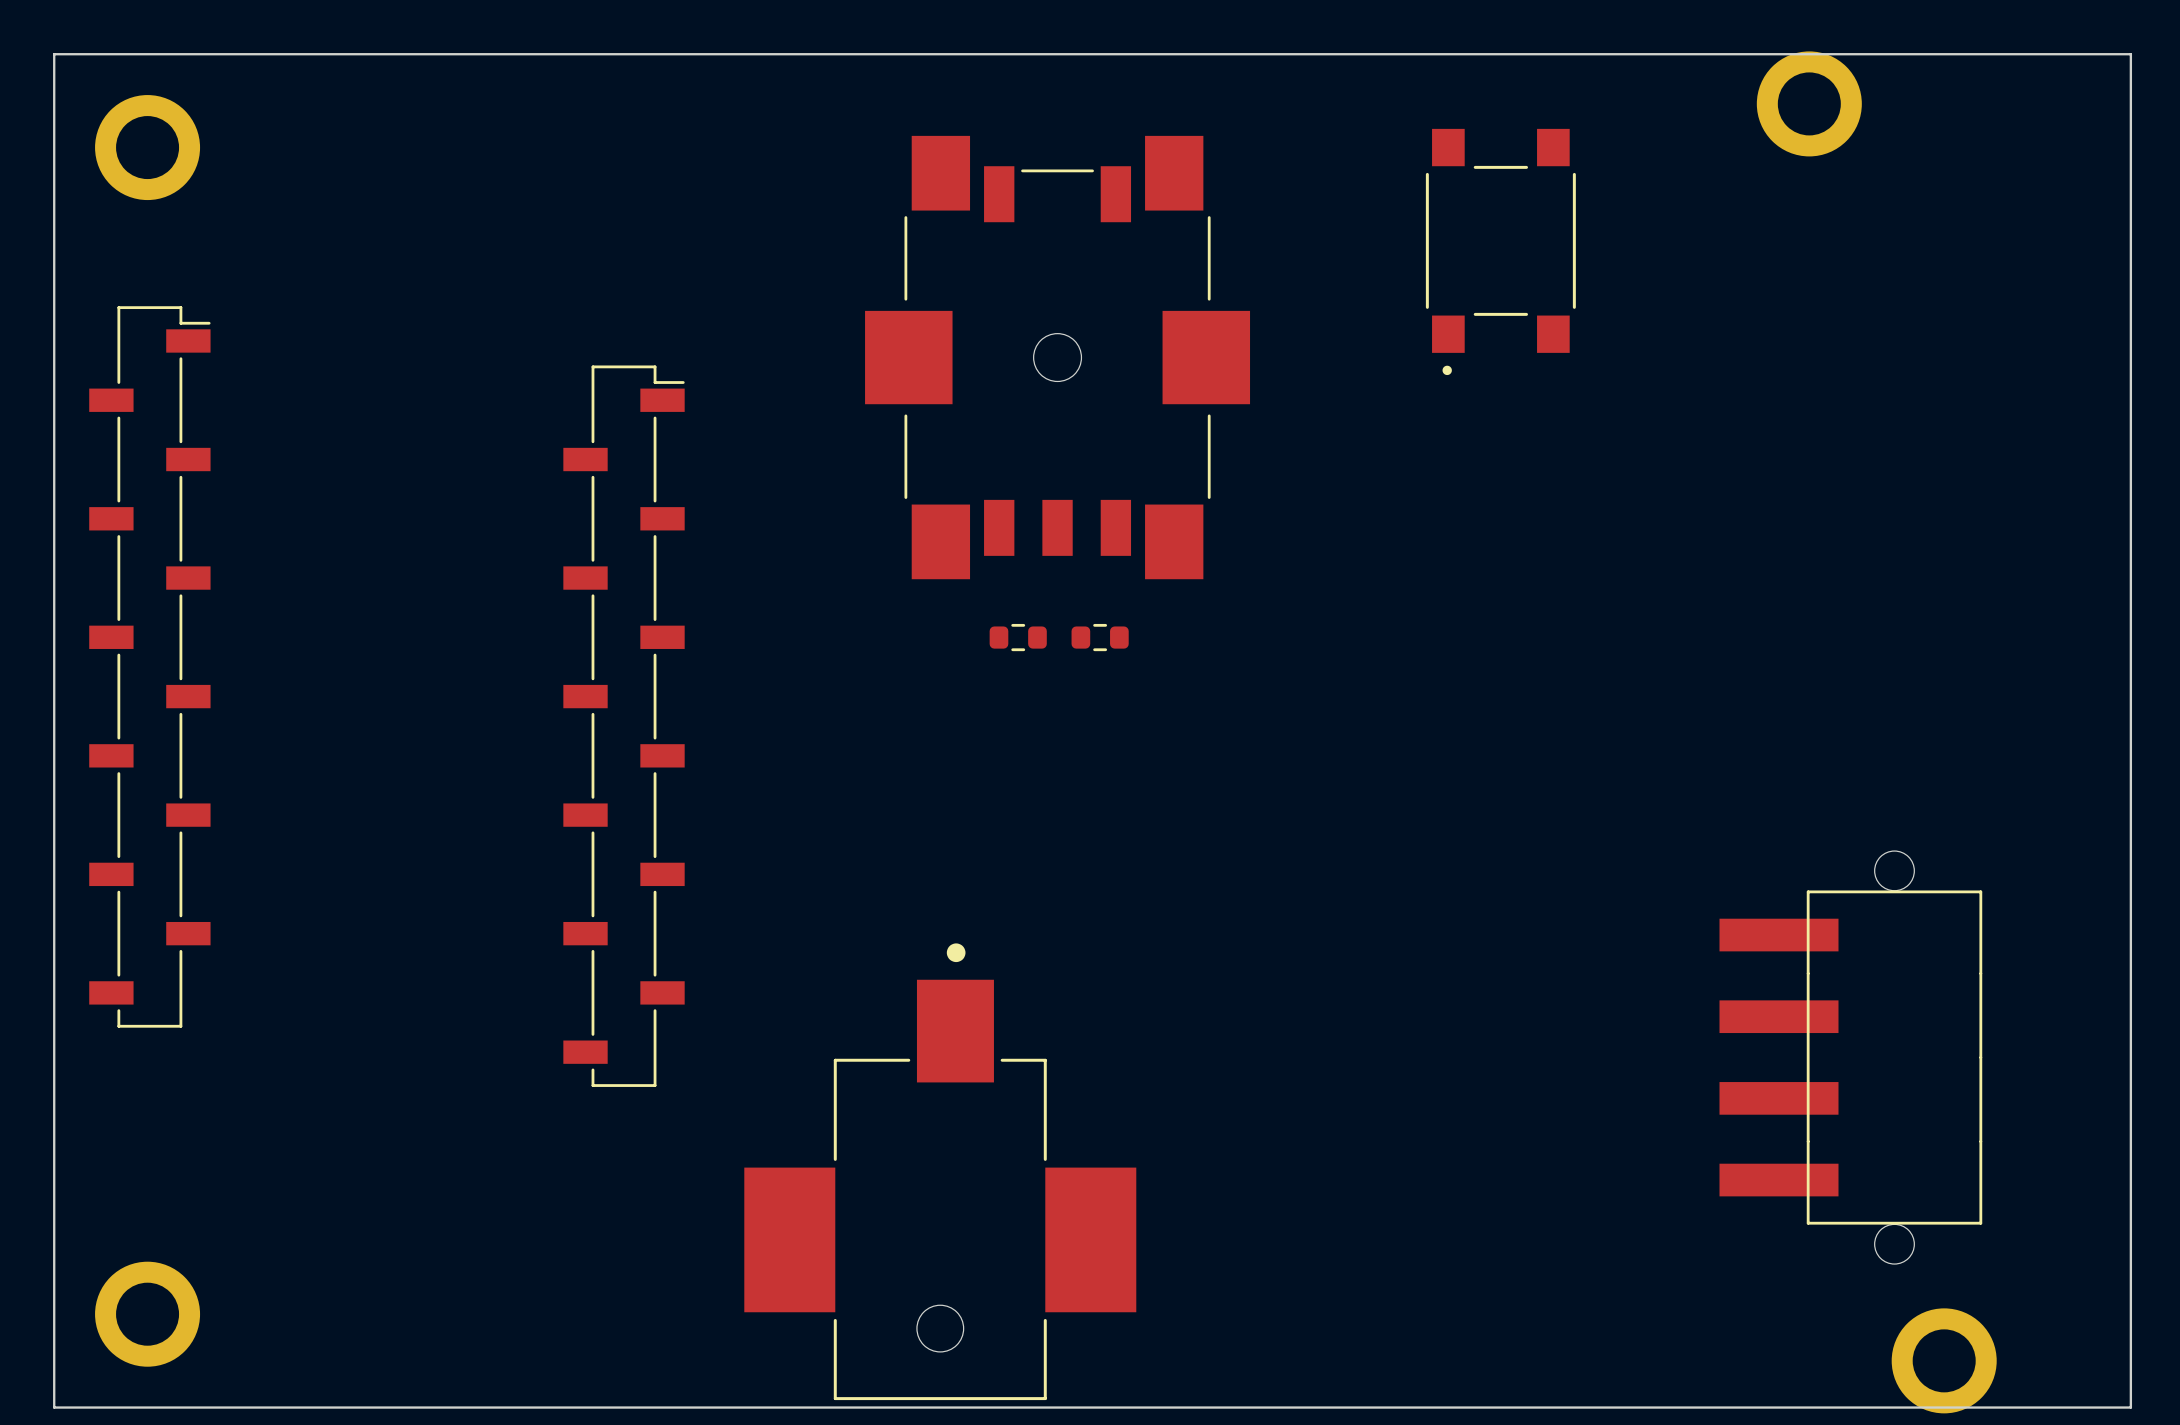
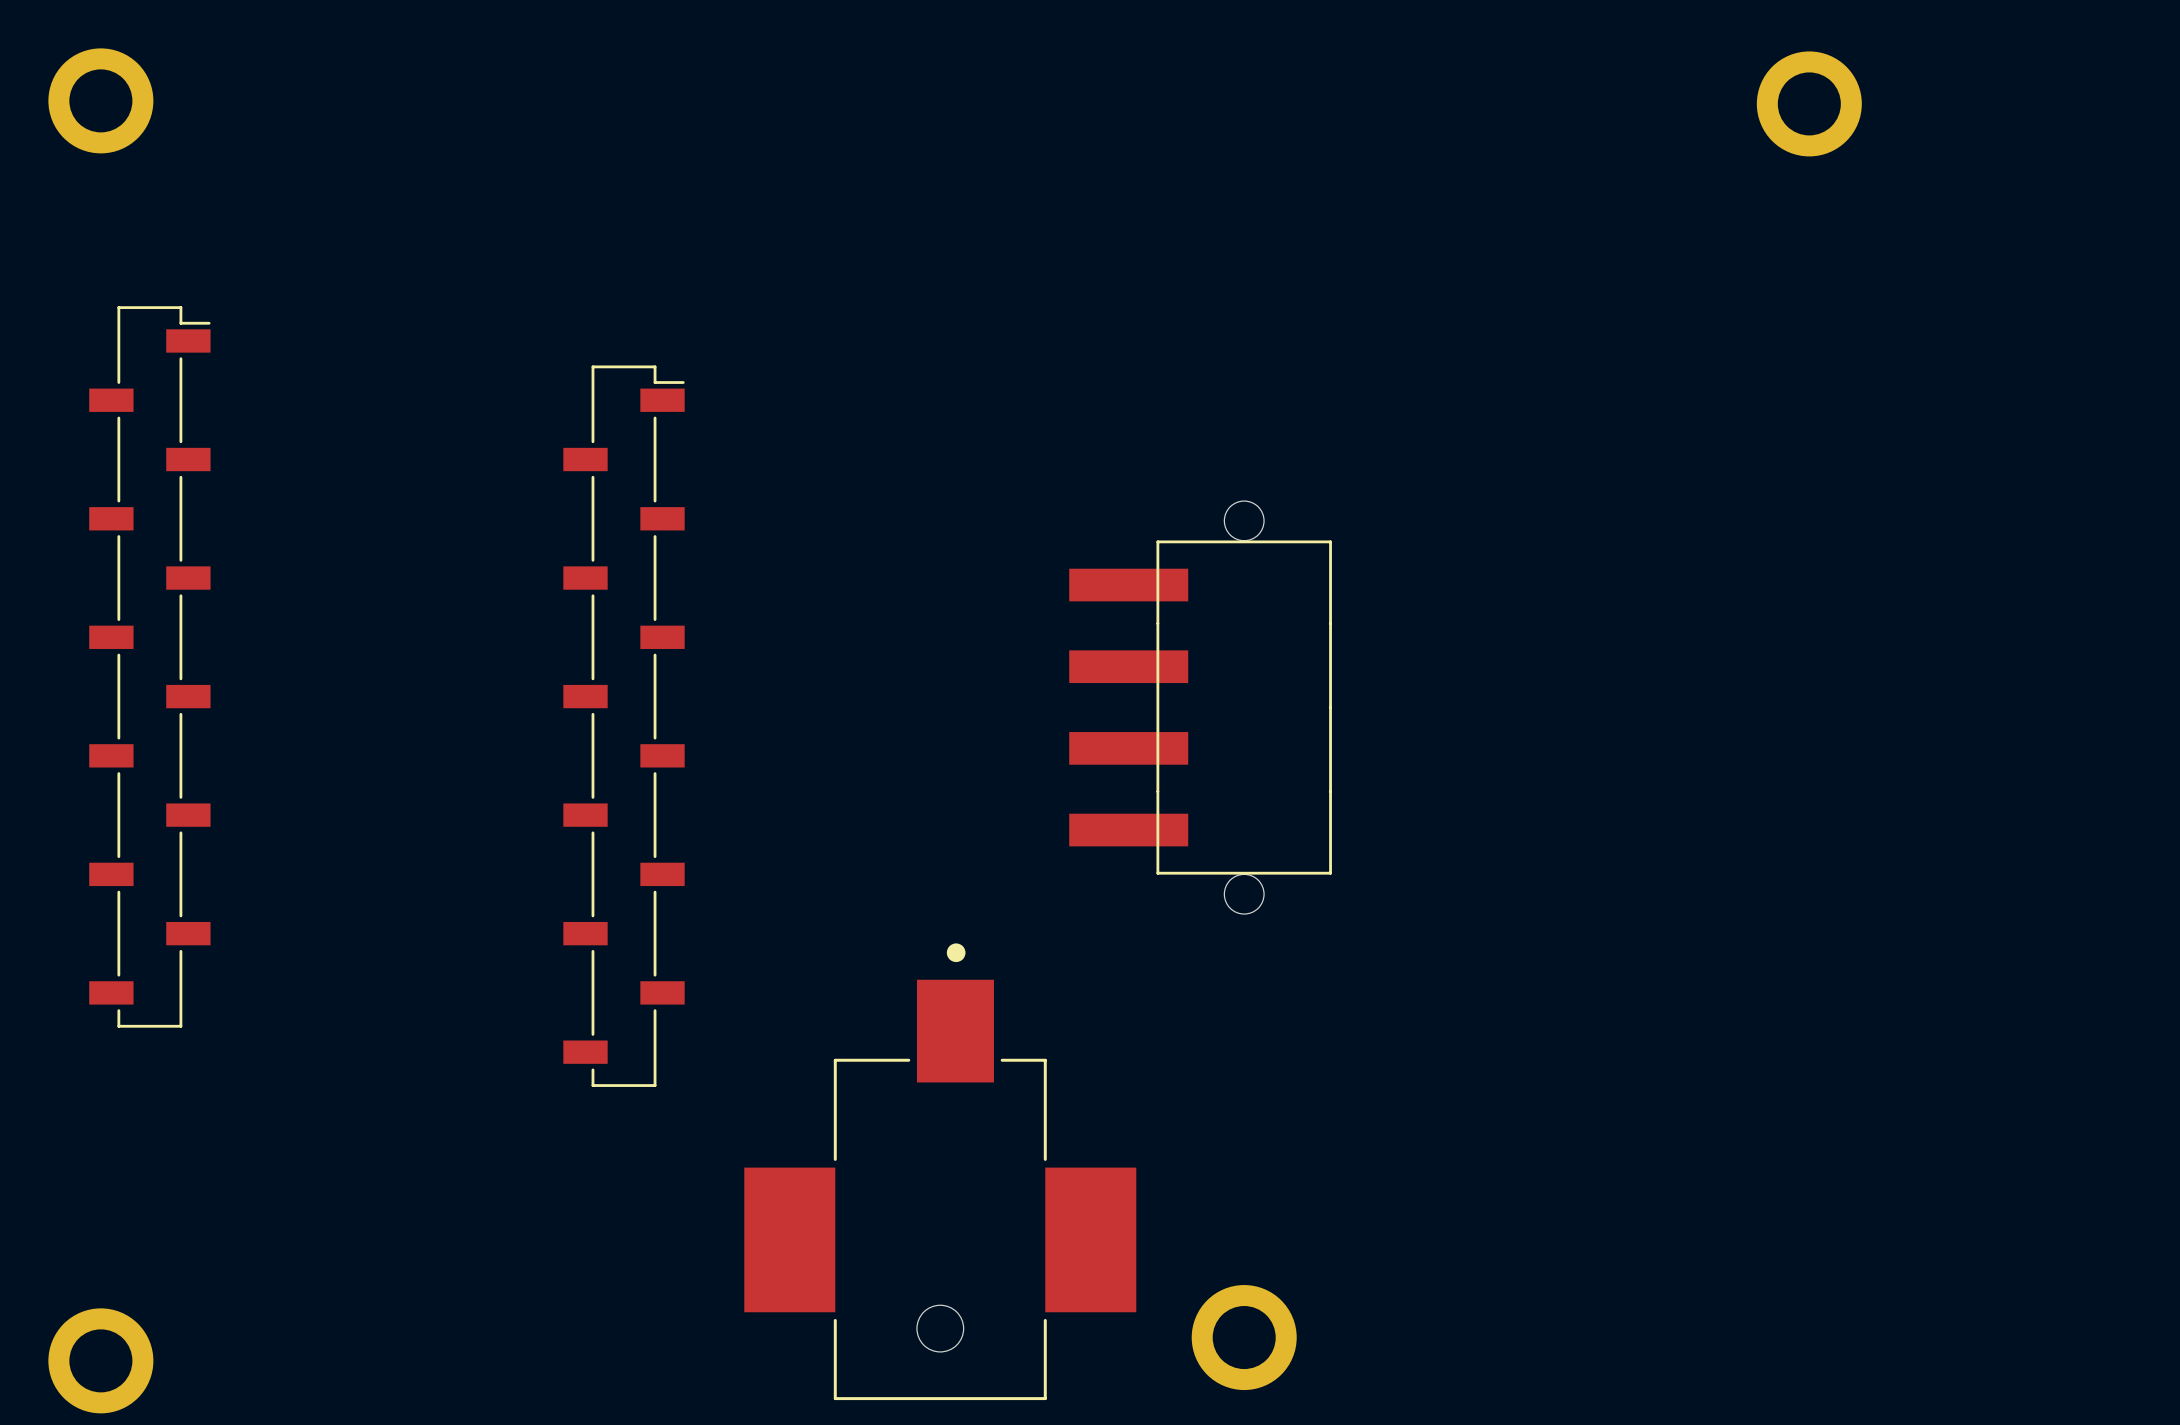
board edge: (54, 54) (54, 1407) (2130, 1407) (2130, 54) (54, 54) -> none
part position: (147, 147) -> (100, 100)
part: (1500, 251) -> none
part: (1057, 357) -> none
part: (1018, 637) -> none
part: (1100, 637) -> none
part: none -> (1200, 707)
part: (1850, 1057) -> none
part position: (147, 1314) -> (100, 1360)
part: none -> (1244, 1337)
part: (1944, 1360) -> none

